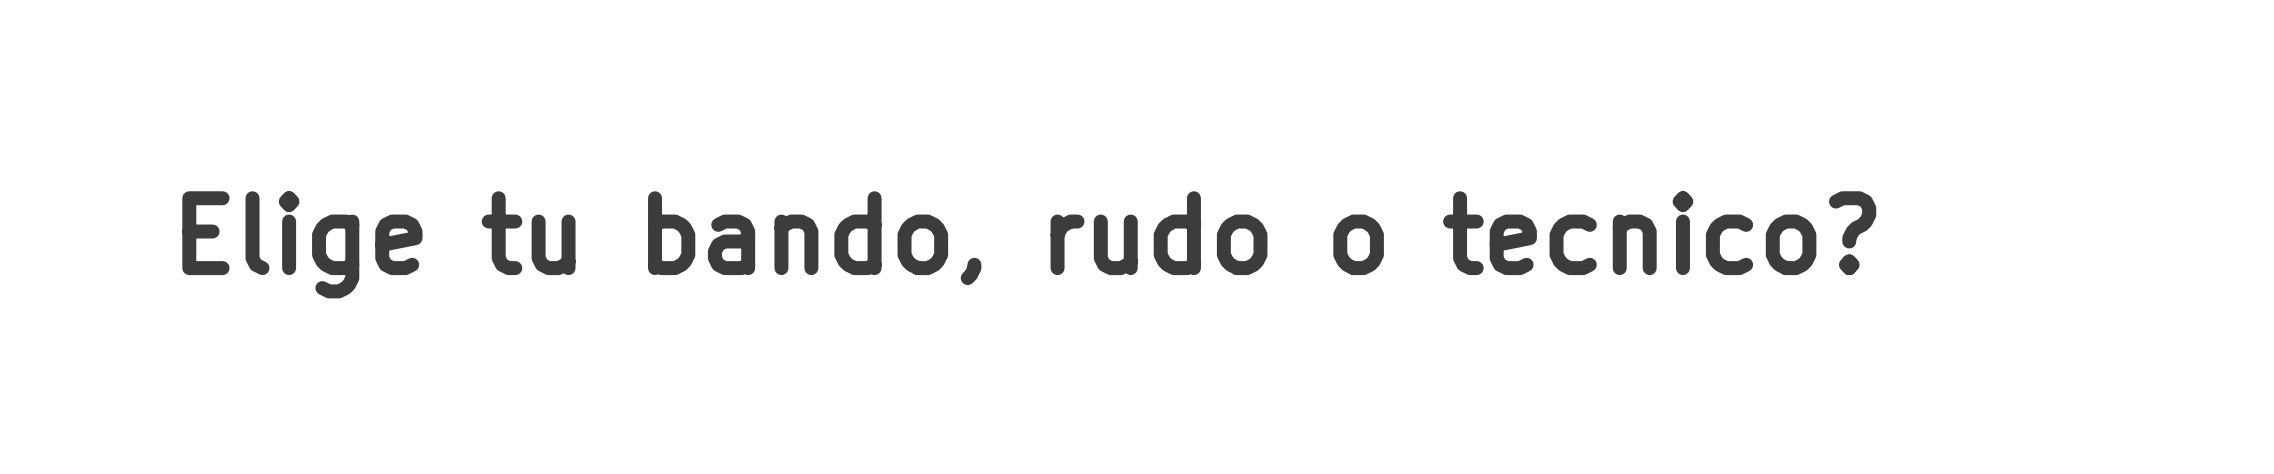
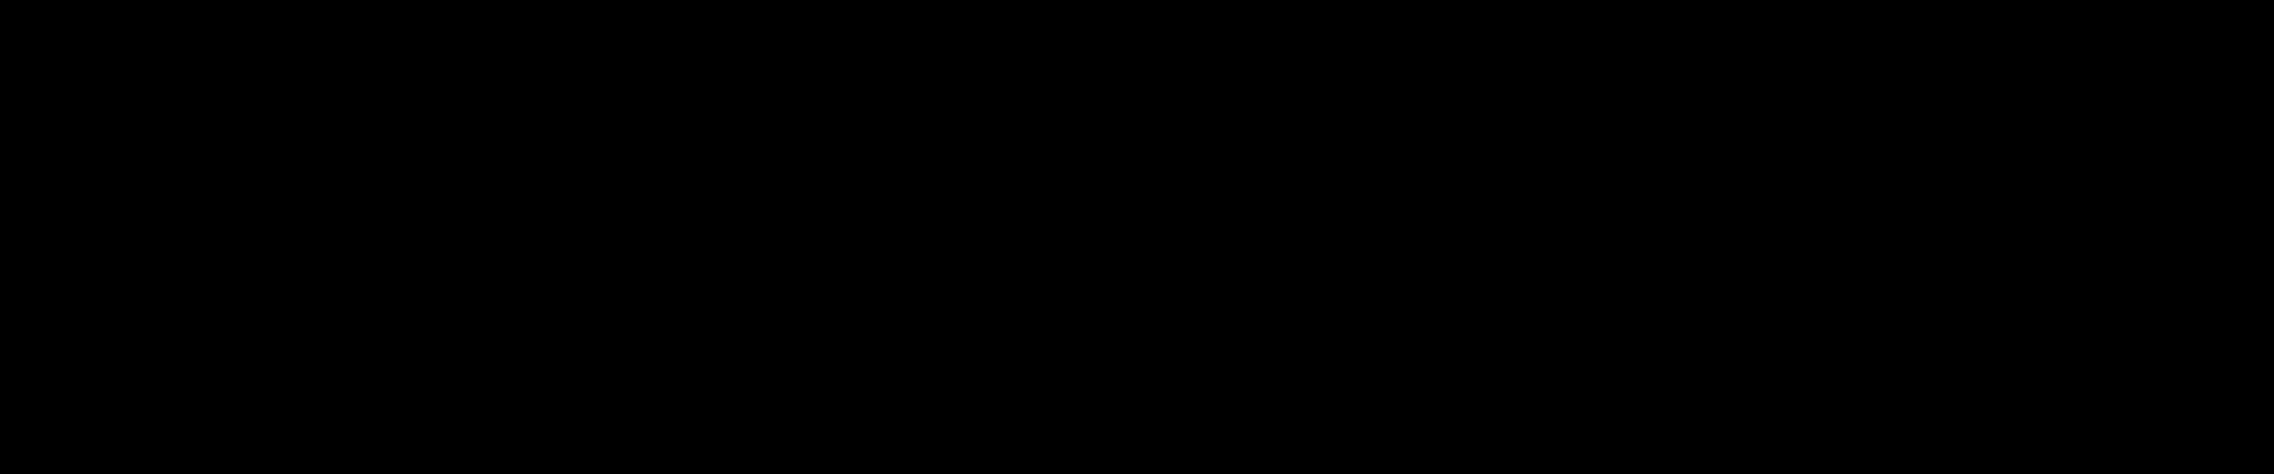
text: Elige tu bando, rudo o tecnico? (1029, 244) -> none

